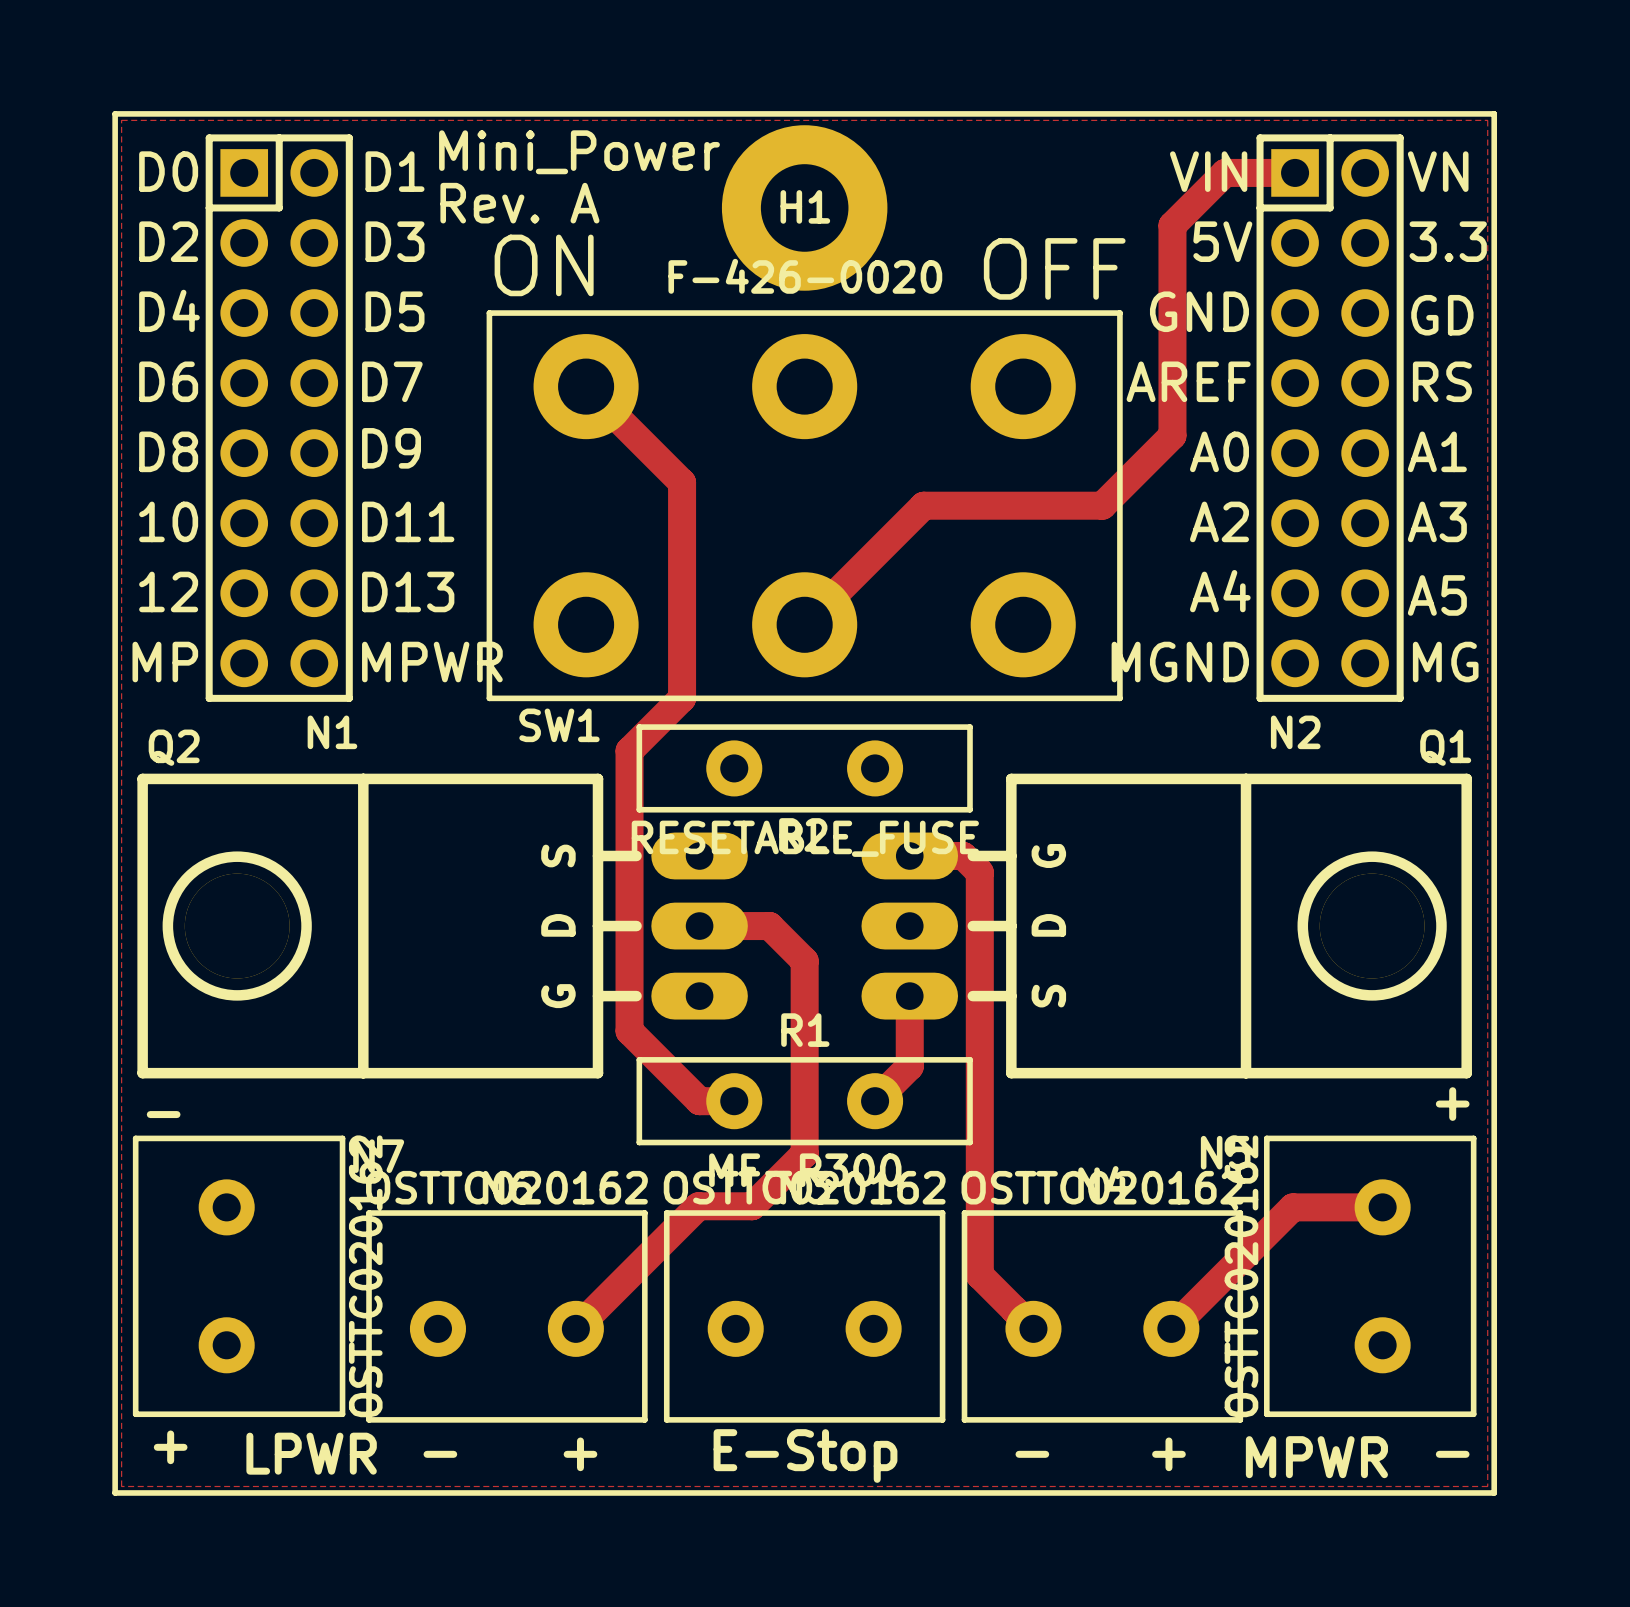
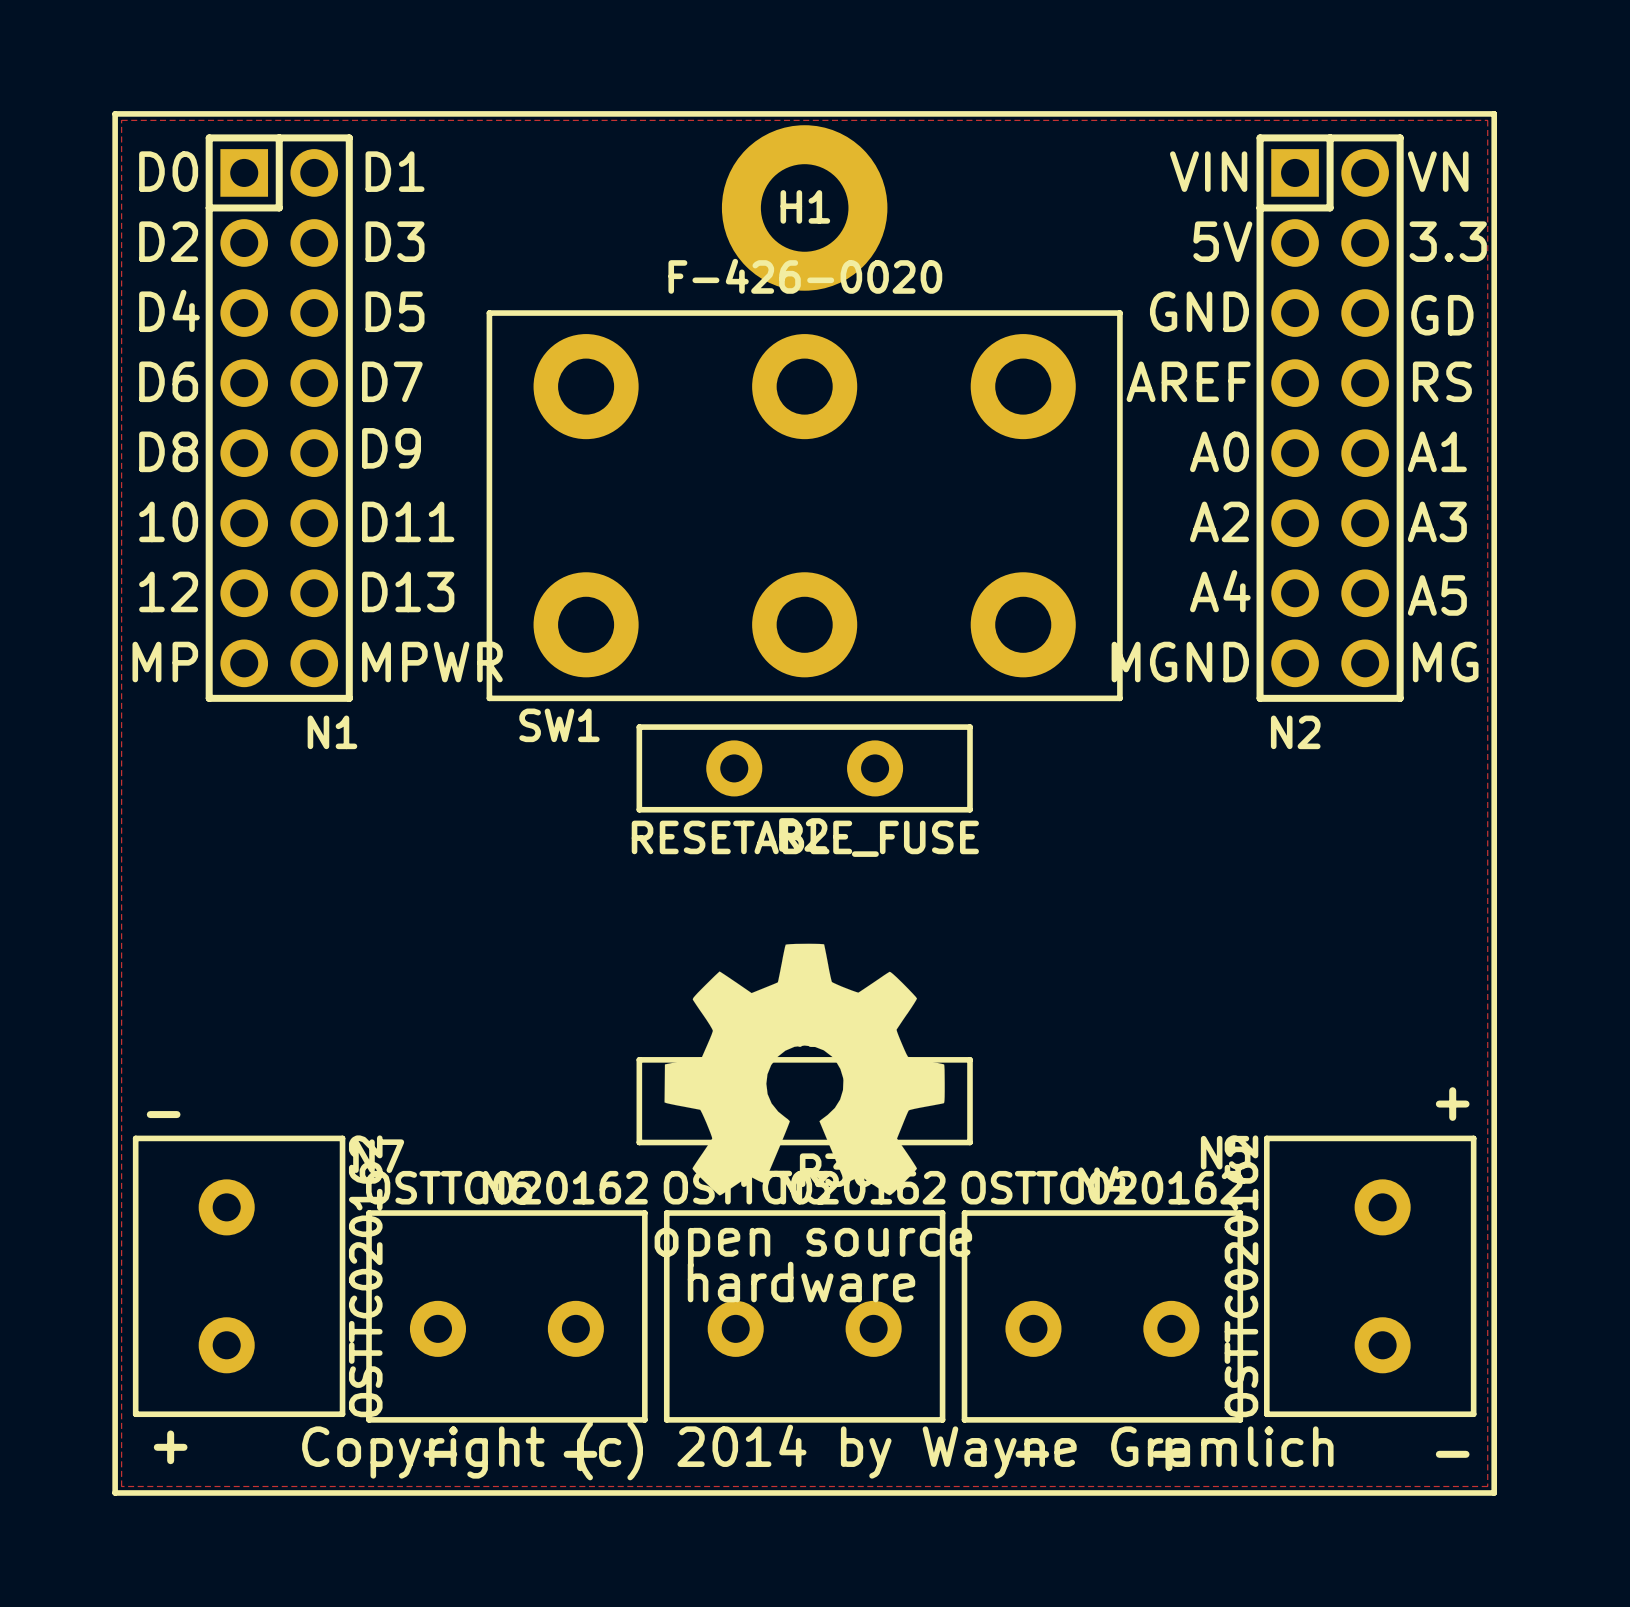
text: Mini_Power (579, 152) -> none
track: (1295, 172) (1225, 172) (1172, 225) (1172, 435) (1102, 505) (923, 505) (804, 624) -> none
text: Rev. A (519, 203) -> none
text: ON (544, 265) -> none
text: OFF (1054, 268) -> none
track: (586, 386) (682, 482) (682, 698) (629, 750) (629, 1031) (699, 1101) (734, 1101) -> none
track: (909, 855) (963, 855) (979, 872) (979, 1275) (1033, 1328) -> none
Q2: (442, 926) -> none
track: (699, 926) (769, 926) (804, 961) (804, 1153) (752, 1206) (698, 1206) (575, 1328) -> none
Q1: (1166, 926) -> none
drawing: none -> [664, 943, 945, 1196]
track: (909, 996) (909, 1066) (875, 1101) -> none
track: (1382, 1207) (1292, 1207) (1171, 1328) -> none
text: none -> open source (813, 1248)
text: none -> hardware (801, 1282)
text: LPWR (311, 1453) -> none
text: E-Stop (805, 1456) -> Copyright (c) 2014 by Wayne Gramlich (817, 1450)
text: MPWR (1316, 1457) -> none

